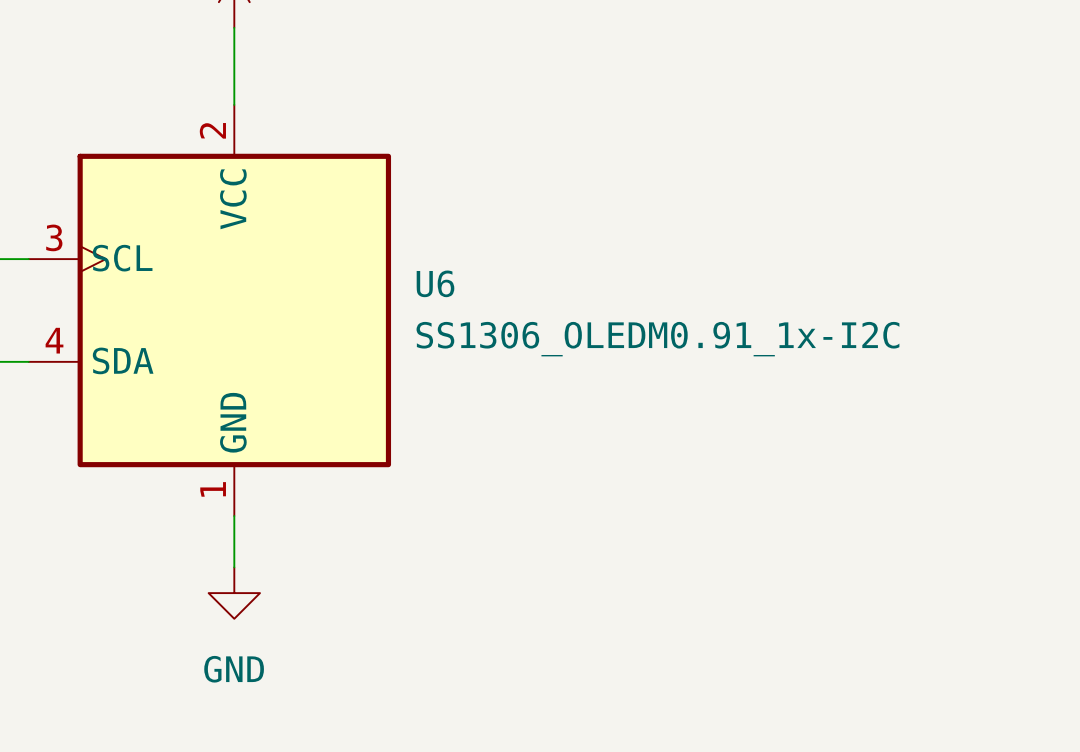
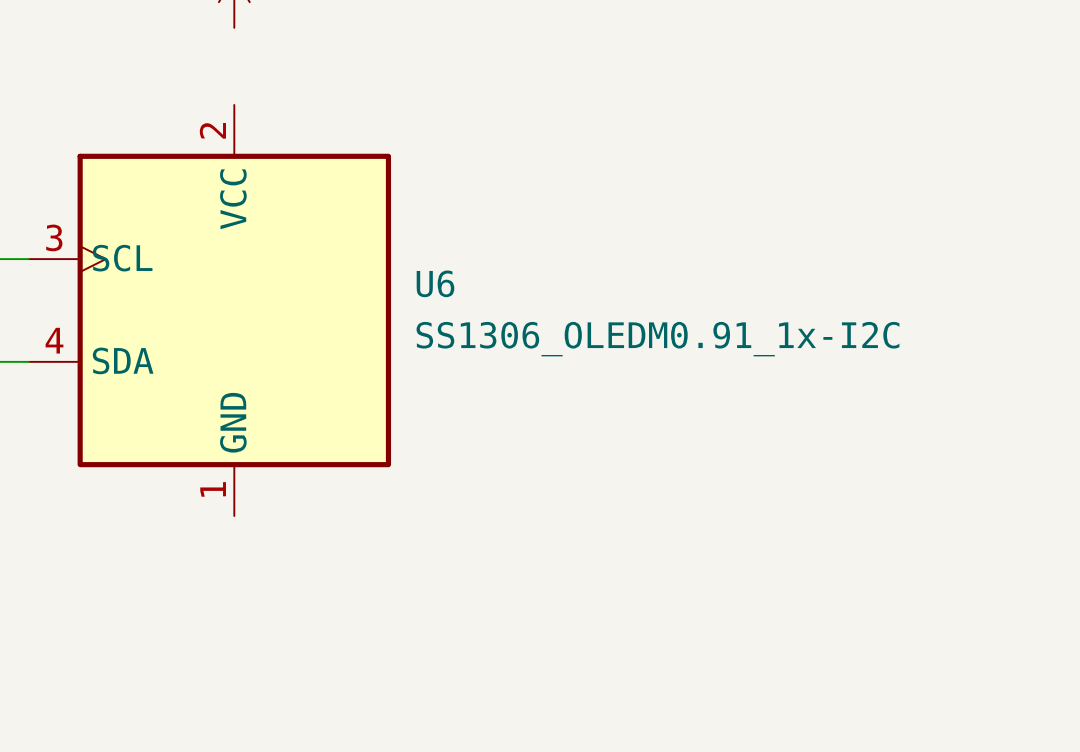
wire: (234, 27) (234, 104) -> none
wire: (234, 516) (234, 567) -> none
power symbol: GND (234, 593) -> none

